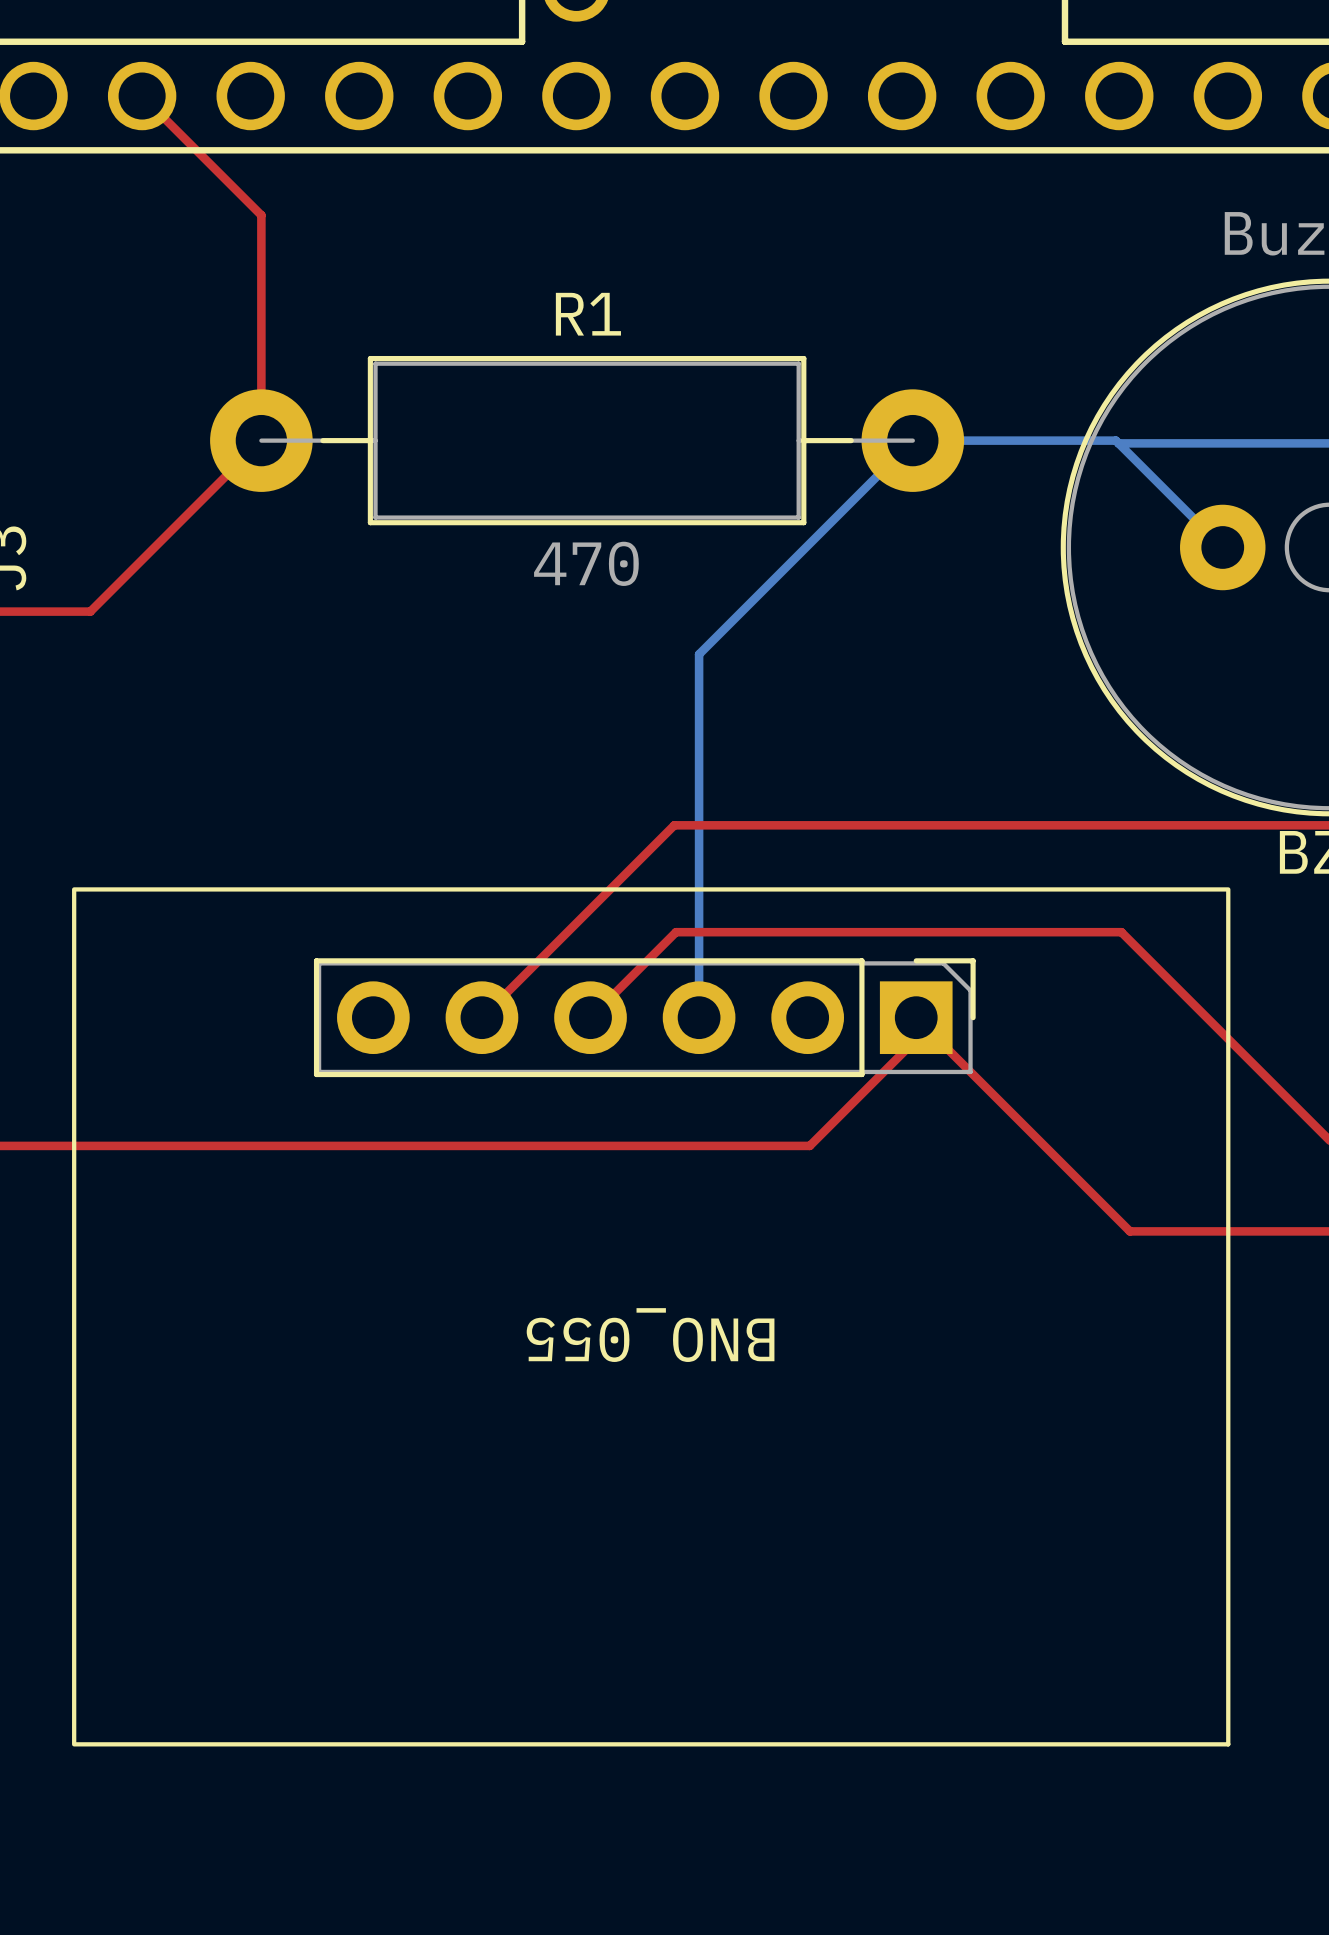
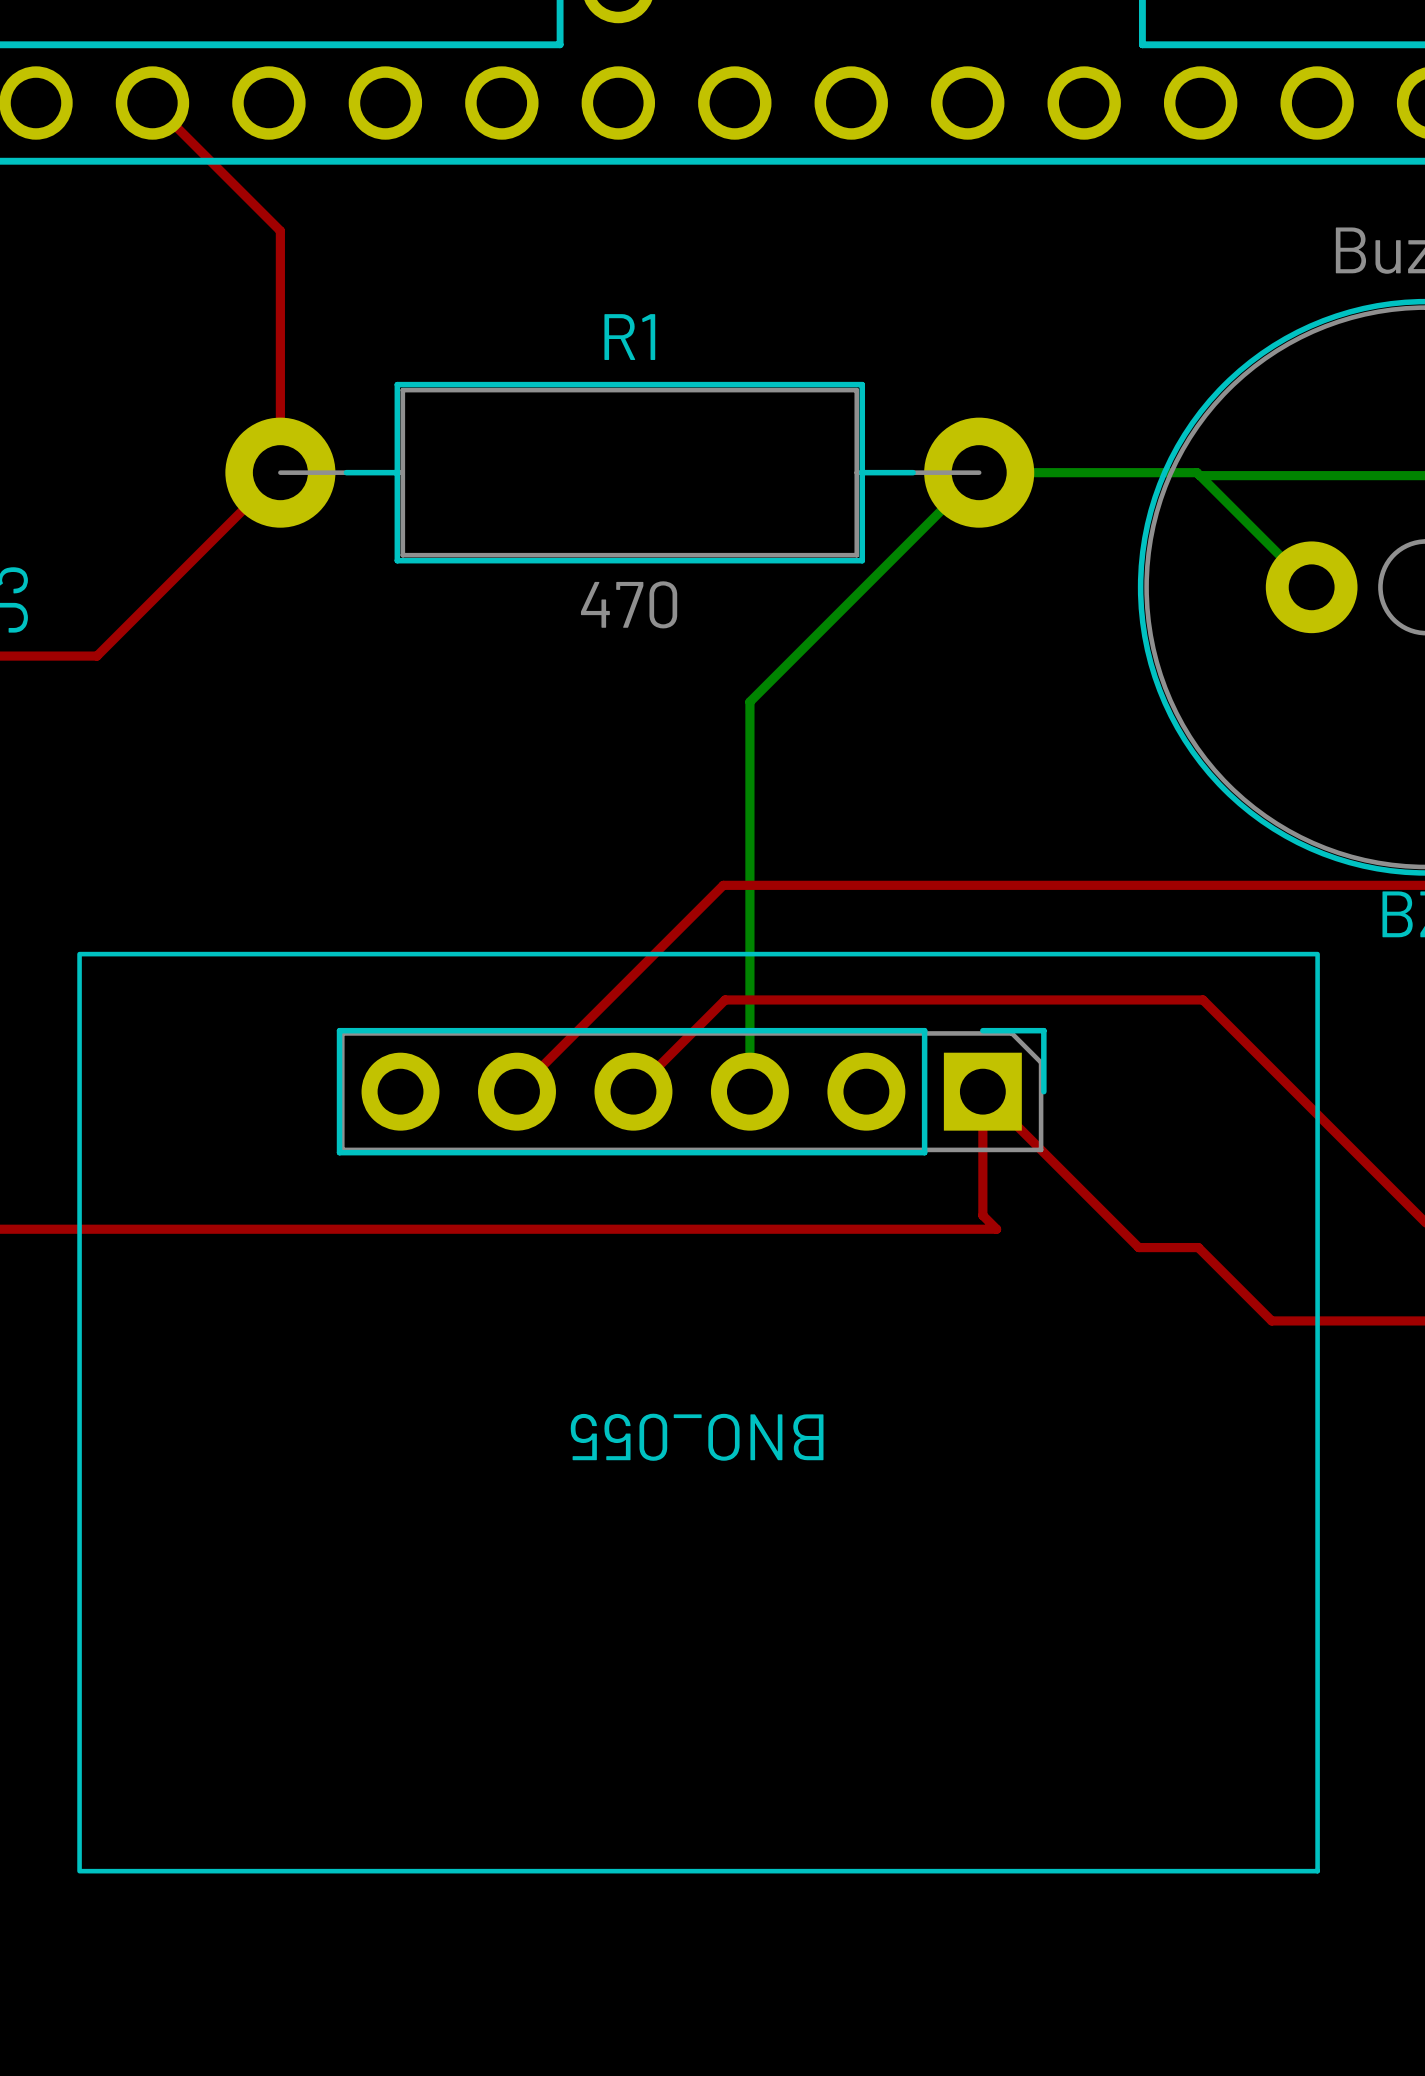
top track: (916, 1039) (809, 1145) -> (982, 1115) (982, 1215) (996, 1229) (868, 1229)
top track: (1061, 1163) (1129, 1231) (1185, 1231) -> (1138, 1247) (1198, 1247) (1271, 1320)

